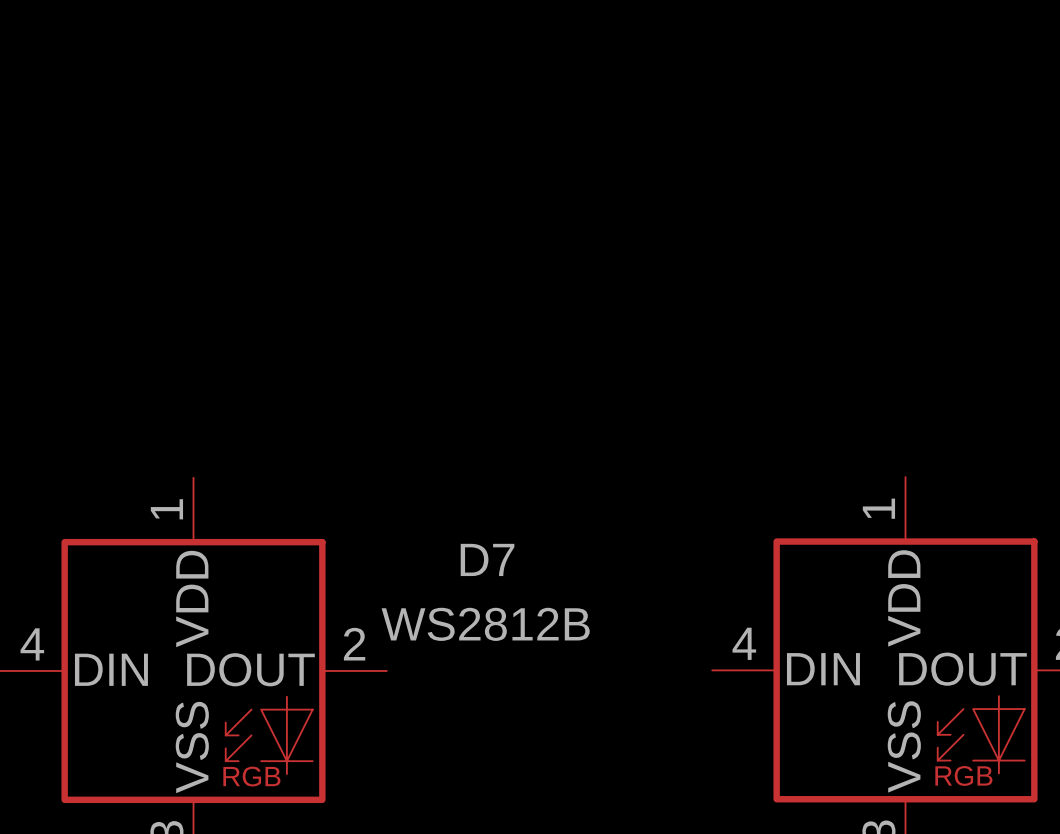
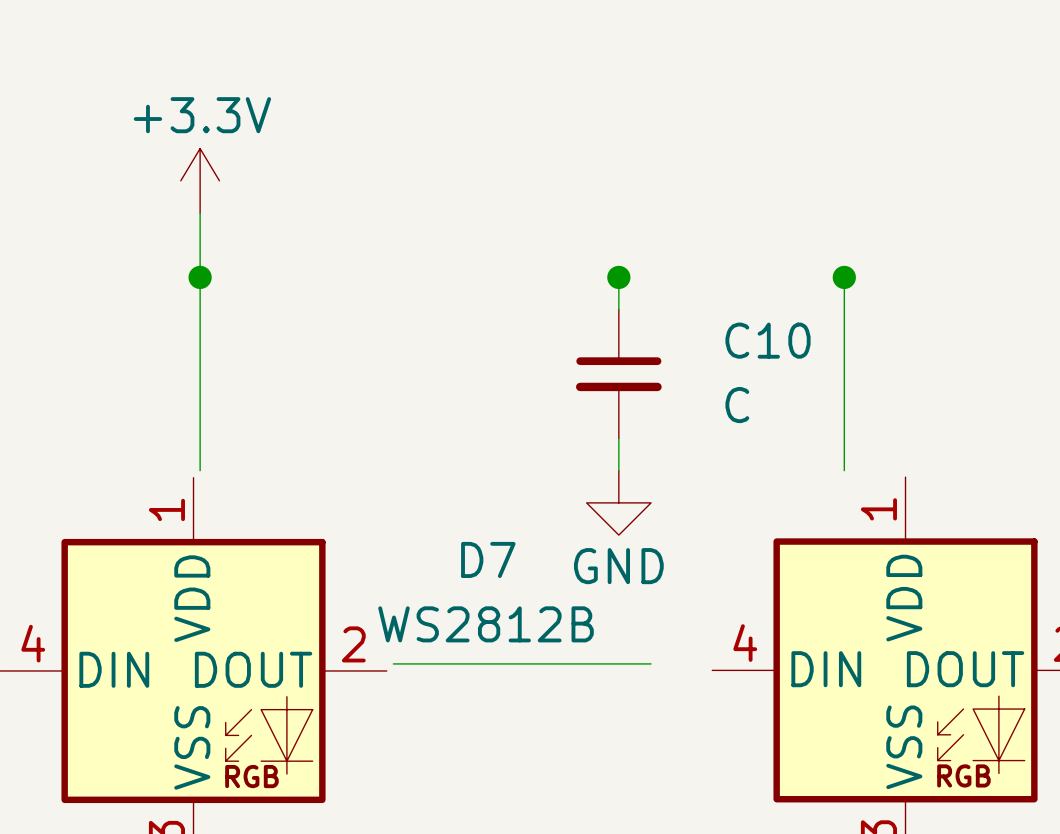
power symbol: none -> +3.3V (200, 180)
wire: none -> (200, 213) (200, 470)
junction: none -> (200, 277)
wire: none -> (618, 277) (618, 309)
junction: none -> (618, 277)
wire: none -> (844, 277) (844, 470)
junction: none -> (844, 277)
C10: none -> C (618, 374)
wire: none -> (618, 438) (618, 470)
power symbol: none -> GND (618, 502)
wire: none -> (393, 663) (651, 663)

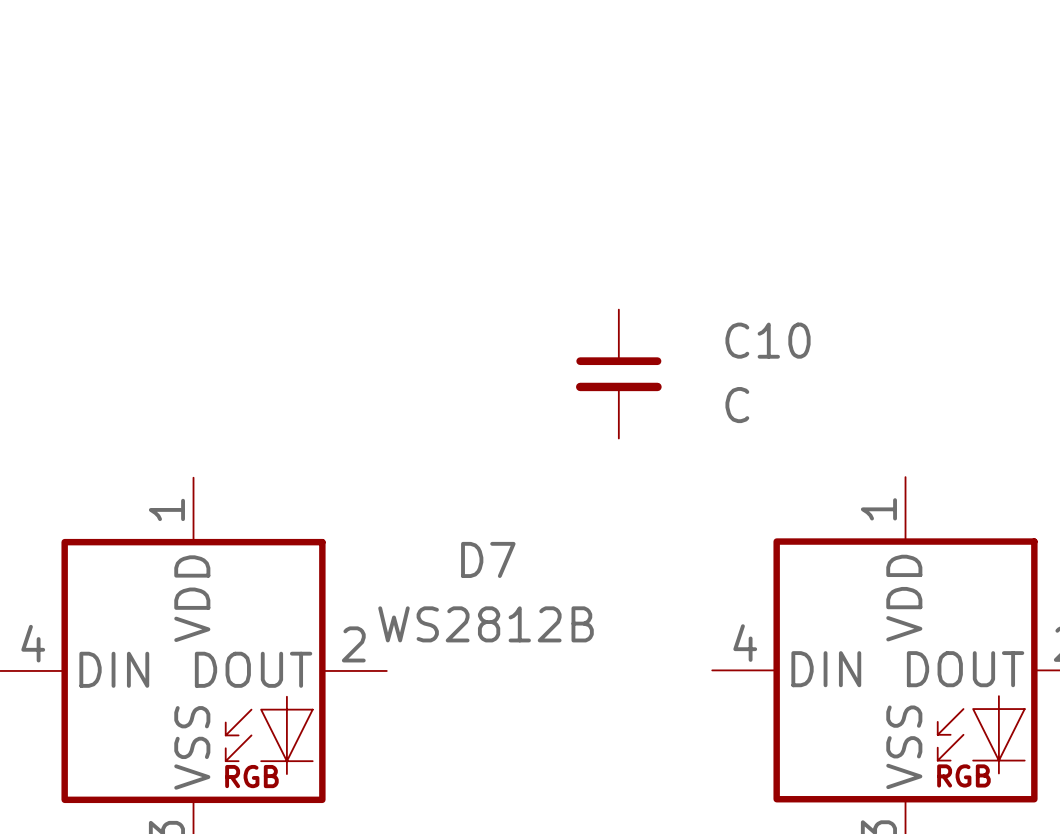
power symbol: +3.3V (200, 180) -> none
wire: (200, 213) (200, 470) -> none
junction: (200, 277) -> none
wire: (618, 277) (618, 309) -> none
junction: (618, 277) -> none
wire: (844, 277) (844, 470) -> none
junction: (844, 277) -> none
wire: (618, 438) (618, 470) -> none
power symbol: GND (618, 502) -> none
wire: (393, 663) (651, 663) -> none

